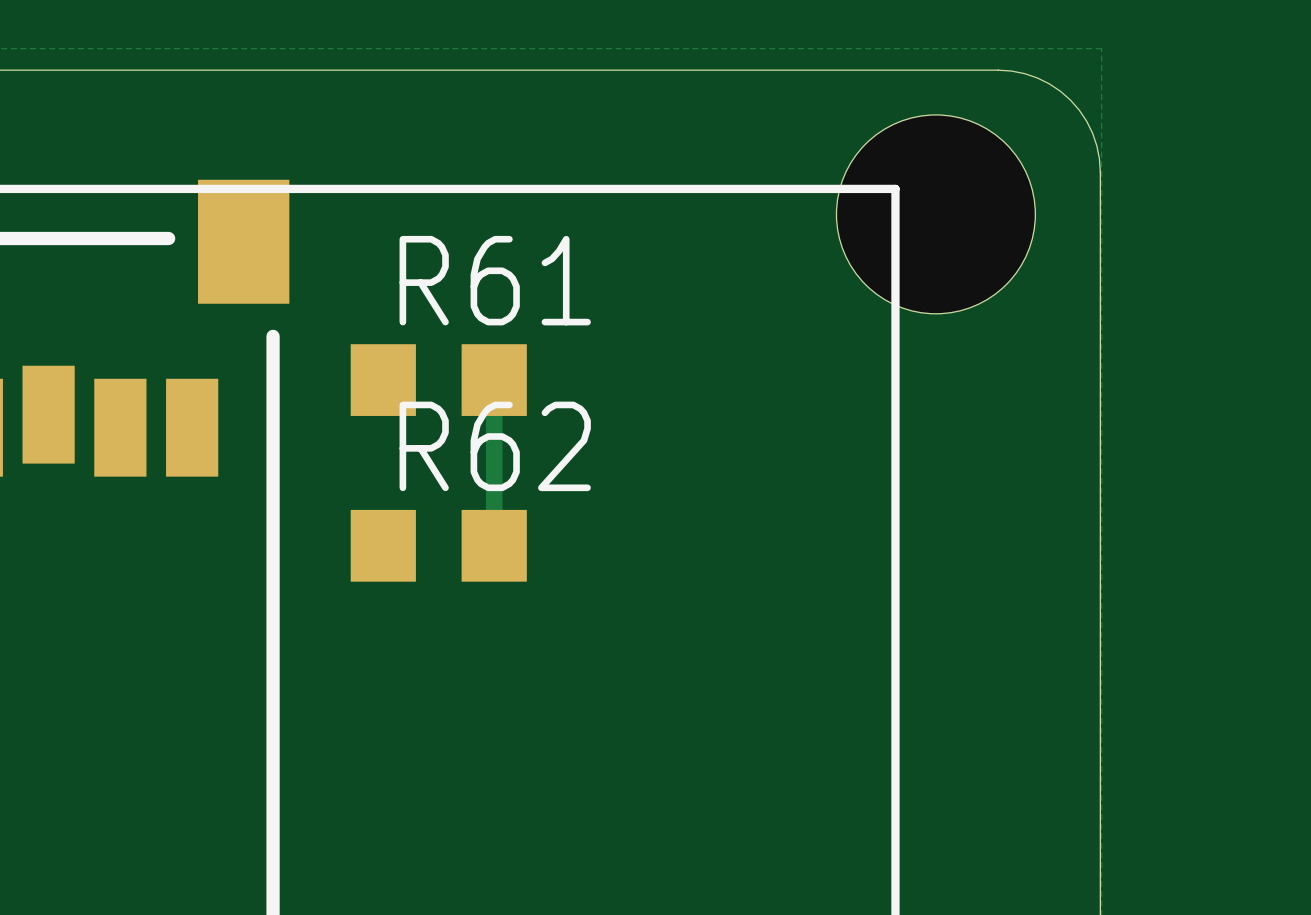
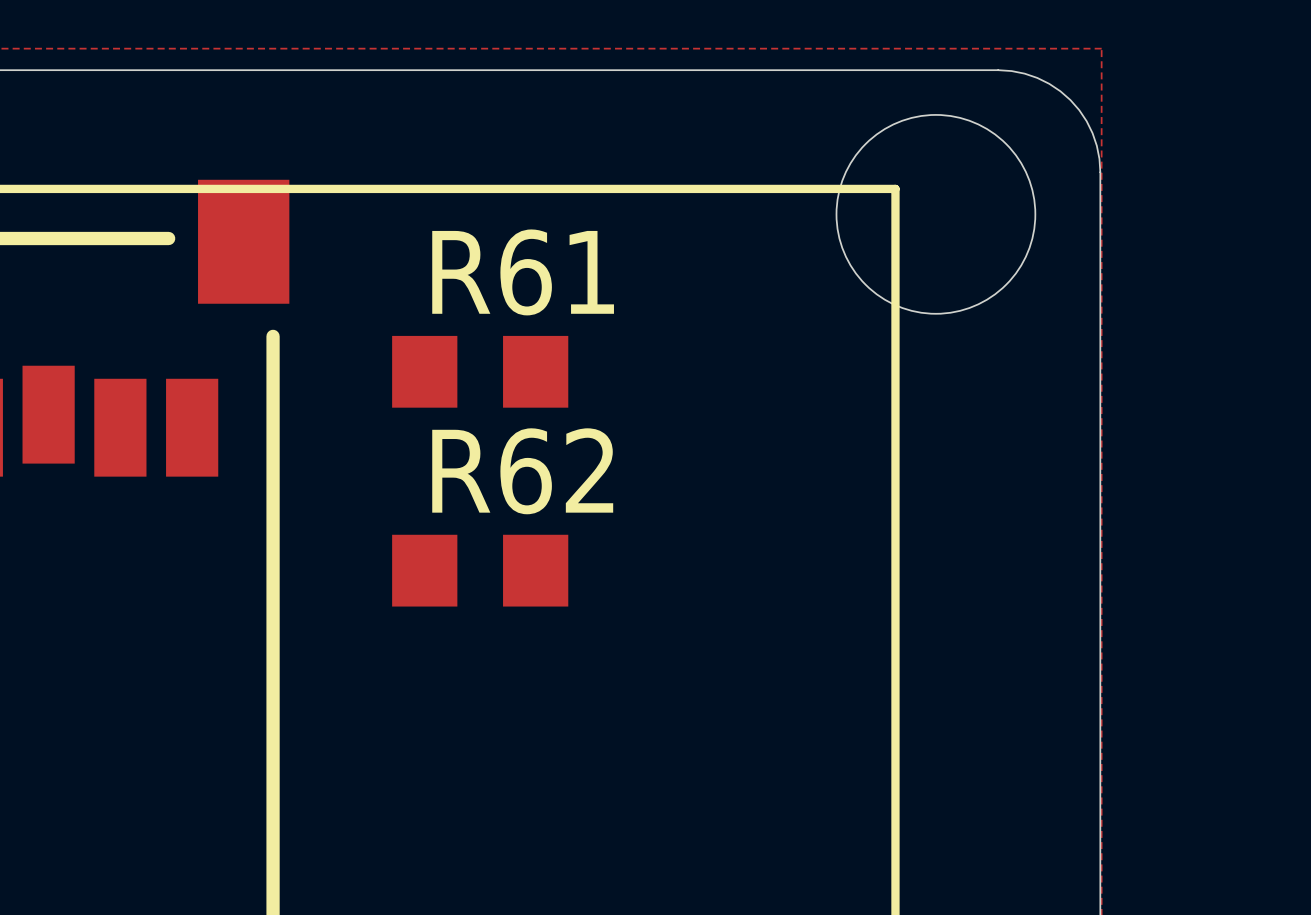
R61 position: (438, 380) -> (480, 371)
track: (494, 380) (494, 545) -> none
R62 position: (438, 545) -> (480, 570)

